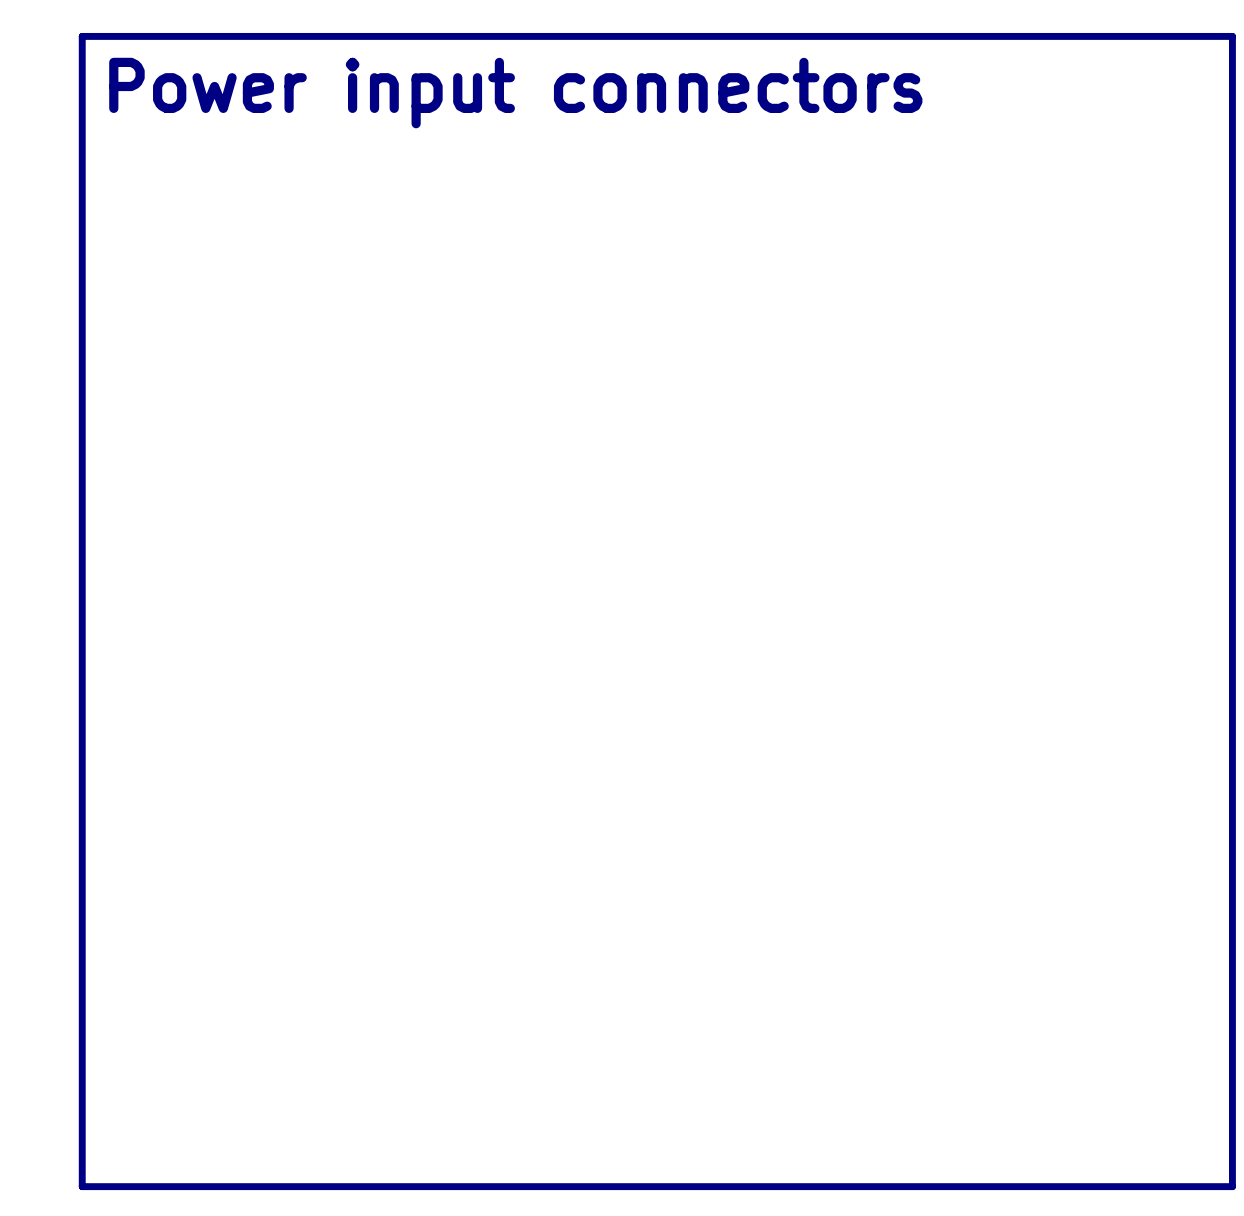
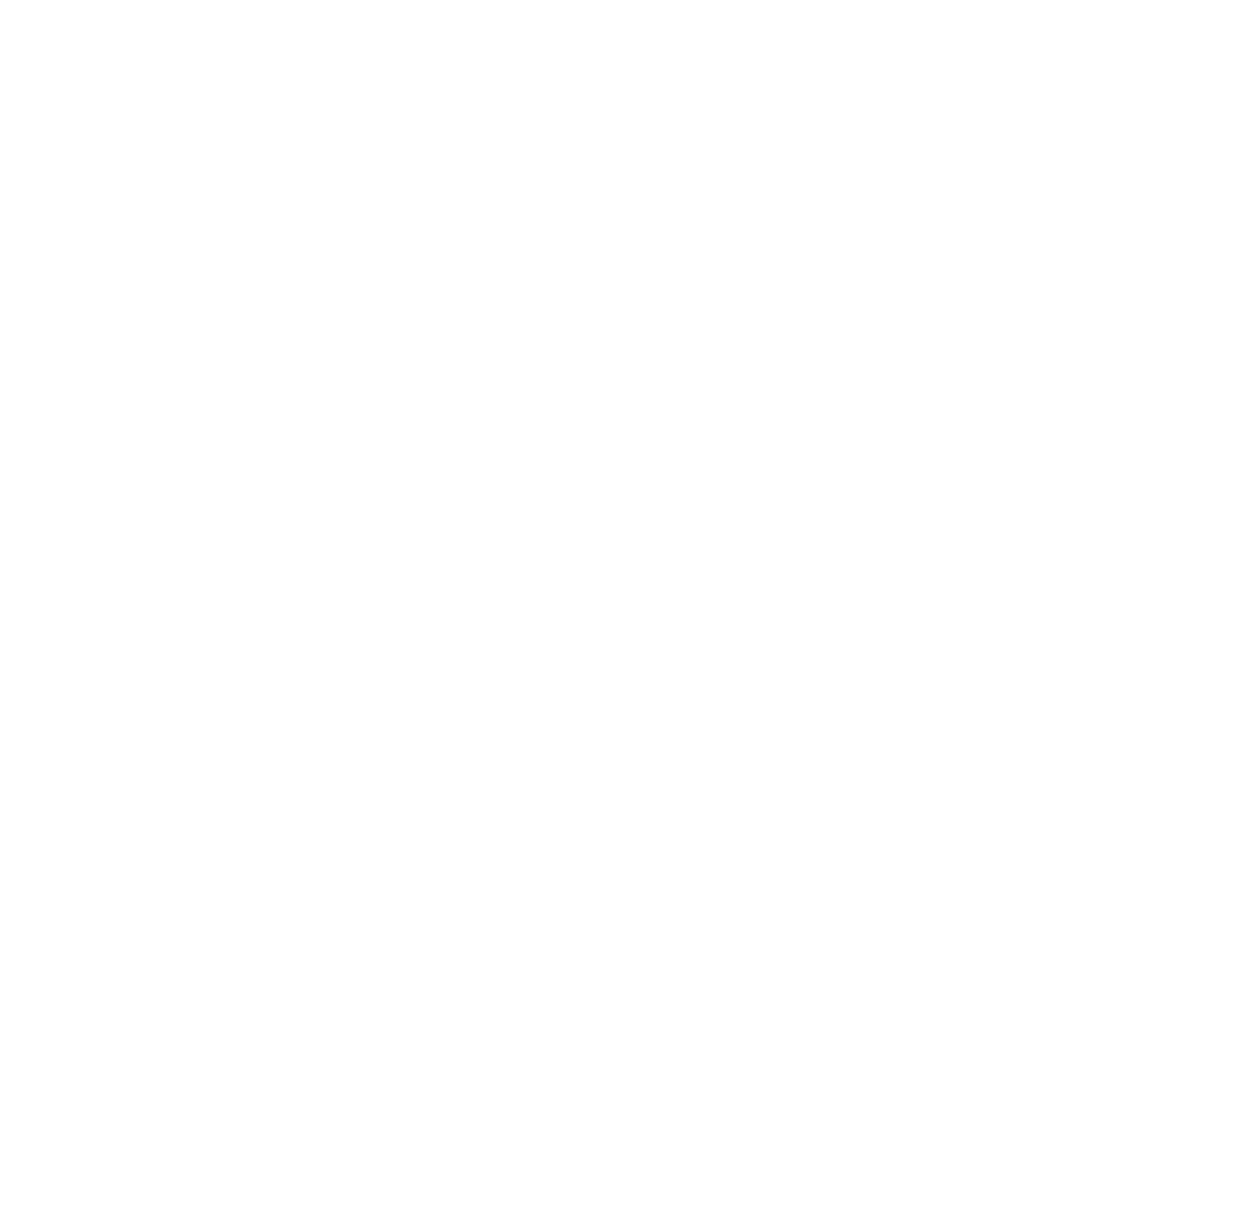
line: (82, 36) (1232, 36) (1232, 1186) (82, 1186) (82, 36) -> none
text: Power input connectors (515, 93) -> none

